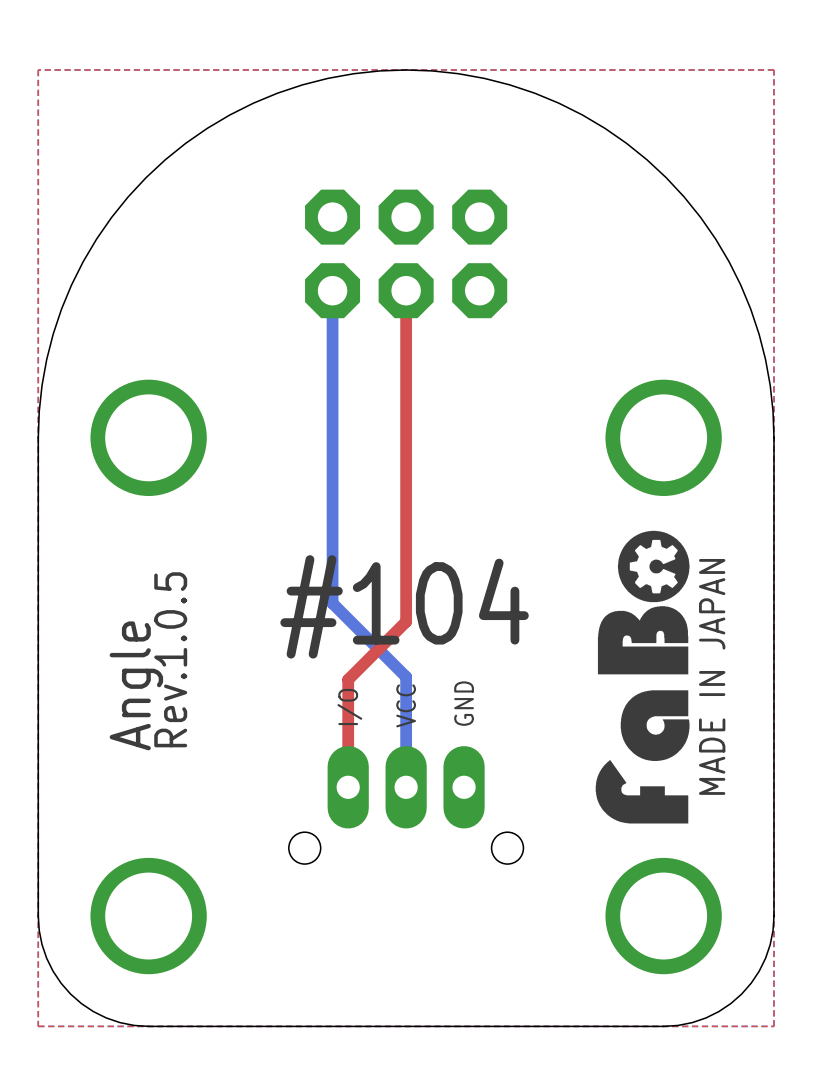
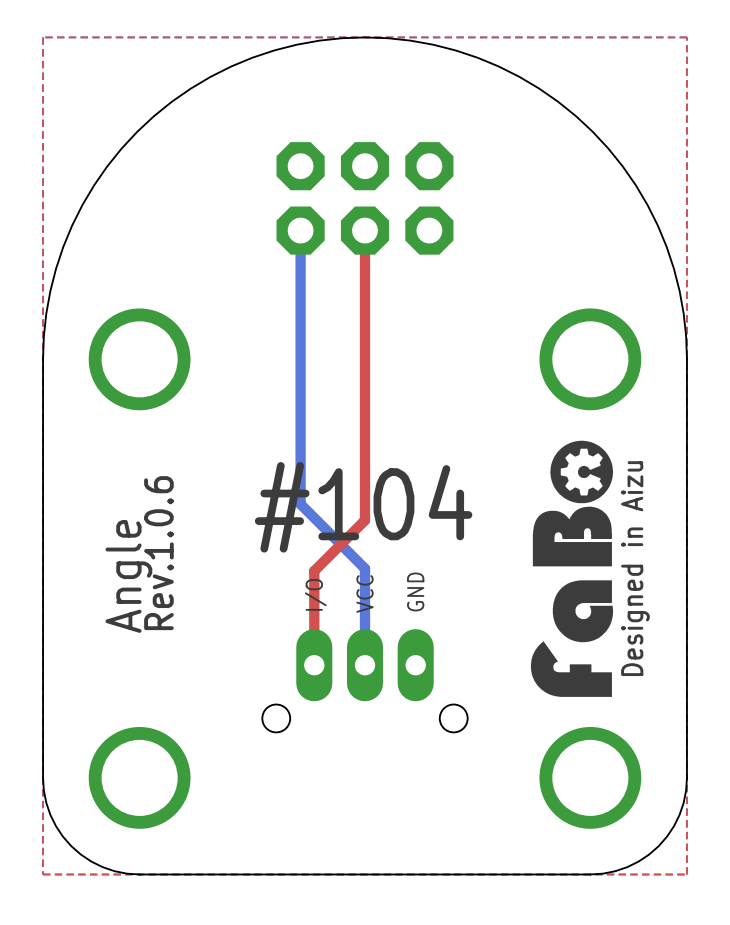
text: Rev.1.0.5 (170, 659) -> Rev.1.0.6 (158, 553)
text: MADE IN JAPAN (712, 676) -> Designed in Aizu (635, 568)

